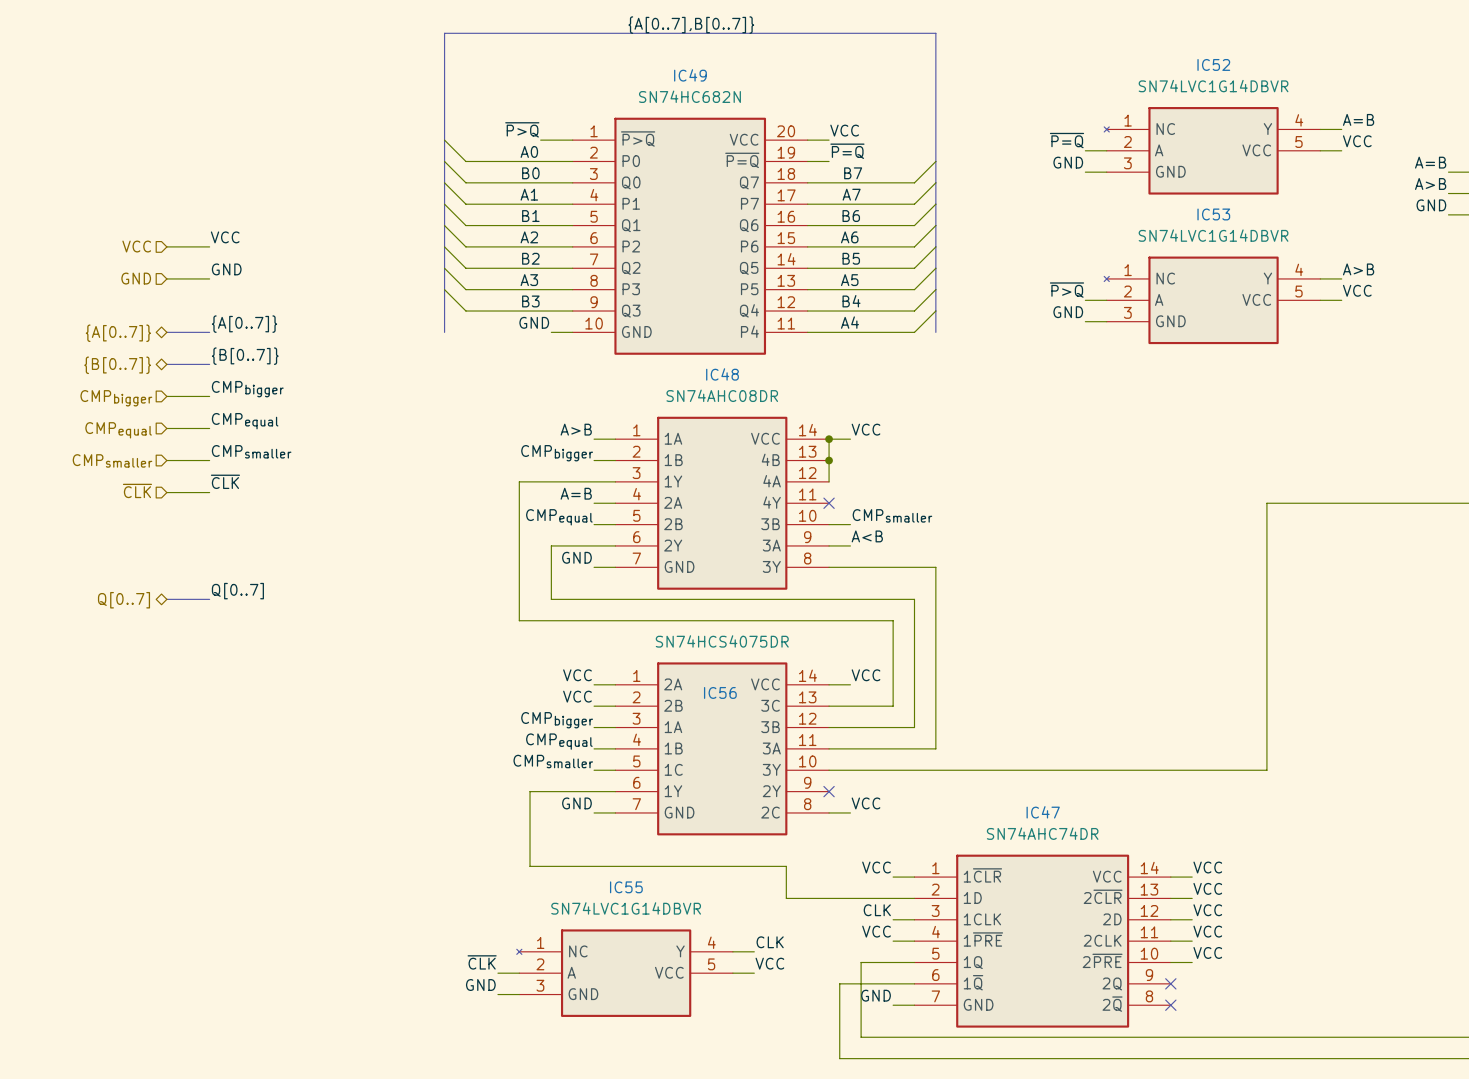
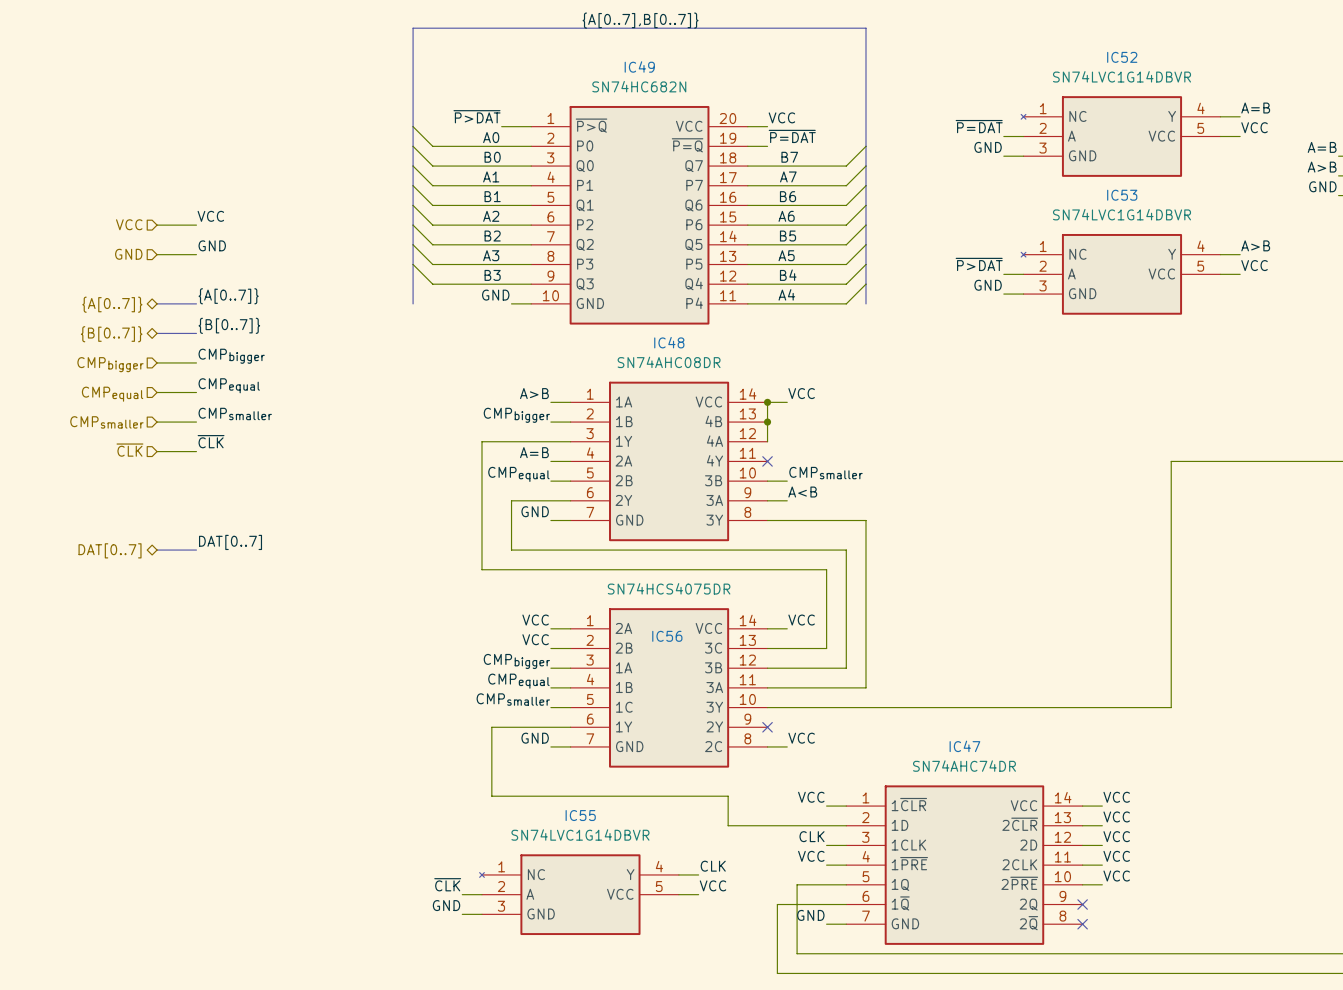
label: ~{P>Q} (522, 129) -> ~{P>DAT} (477, 116)
label: ~{P=Q} (1066, 140) -> ~{P=DAT} (979, 126)
label: ~{P=Q} (847, 151) -> ~{P=DAT} (792, 136)
label: ~{P>Q} (1066, 290) -> ~{P>DAT} (979, 264)
label: Q[0..7] (237, 591) -> DAT[0..7] (230, 542)
hierarchical label: Q[0..7] (123, 600) -> DAT[0..7] (110, 550)

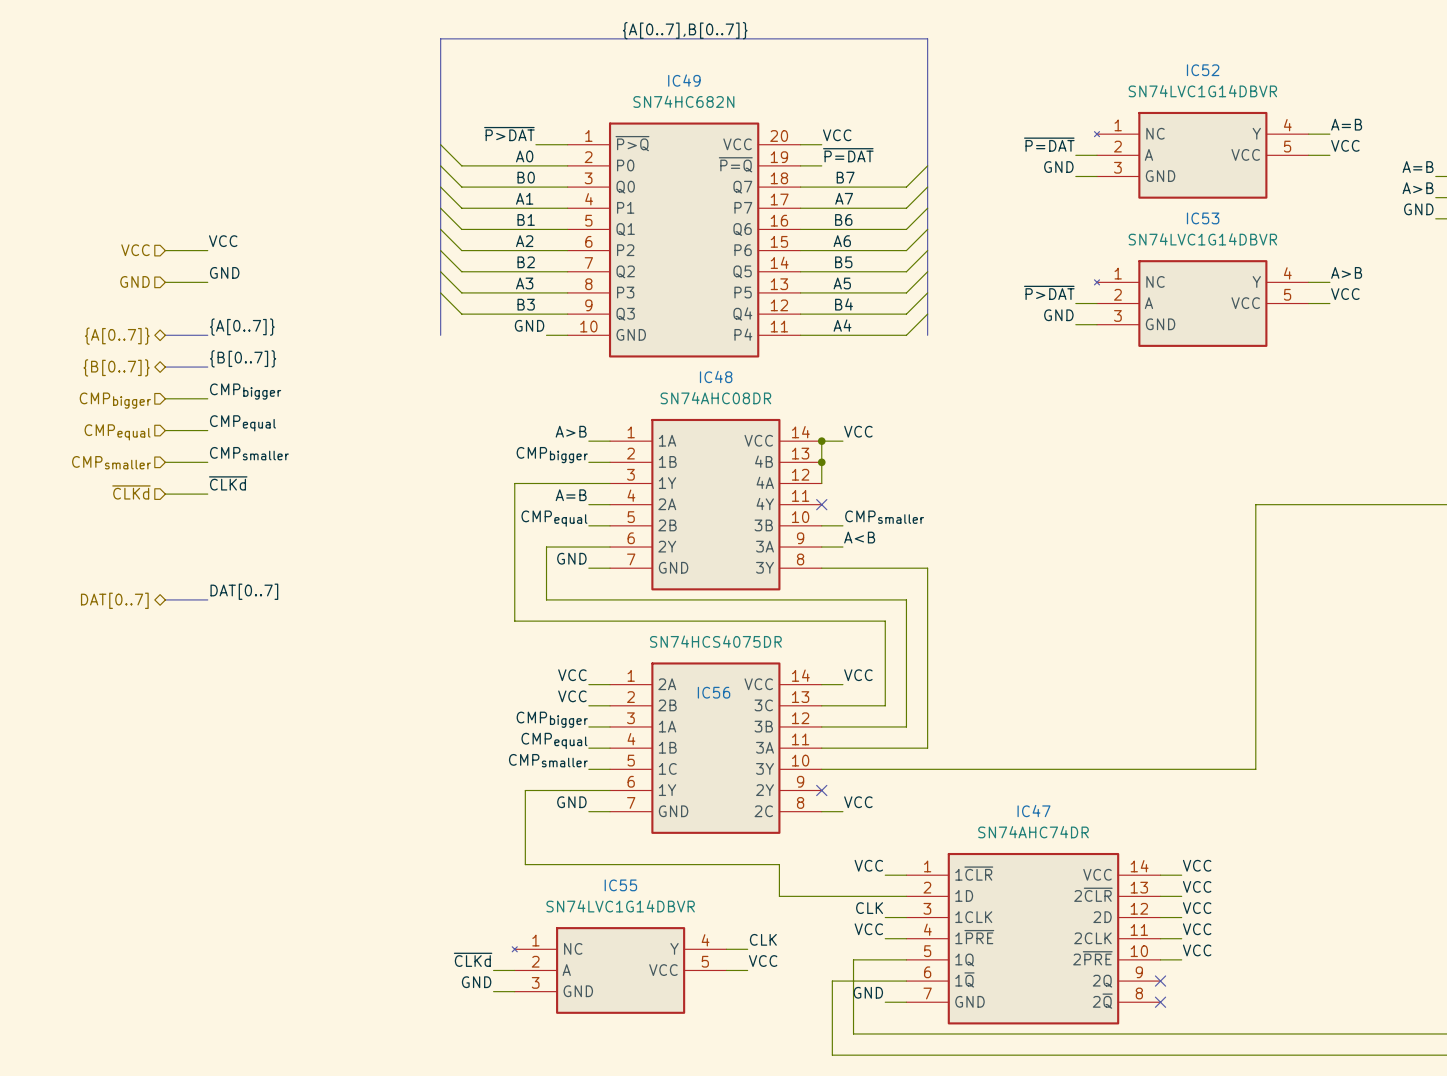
label: ~{CLK} (211, 441) -> ~{CLKd} (228, 483)
hierarchical label: ~{CLK} (129, 450) -> ~{CLKd} (131, 492)
label: ~{CLK} (447, 884) -> ~{CLKd} (473, 959)

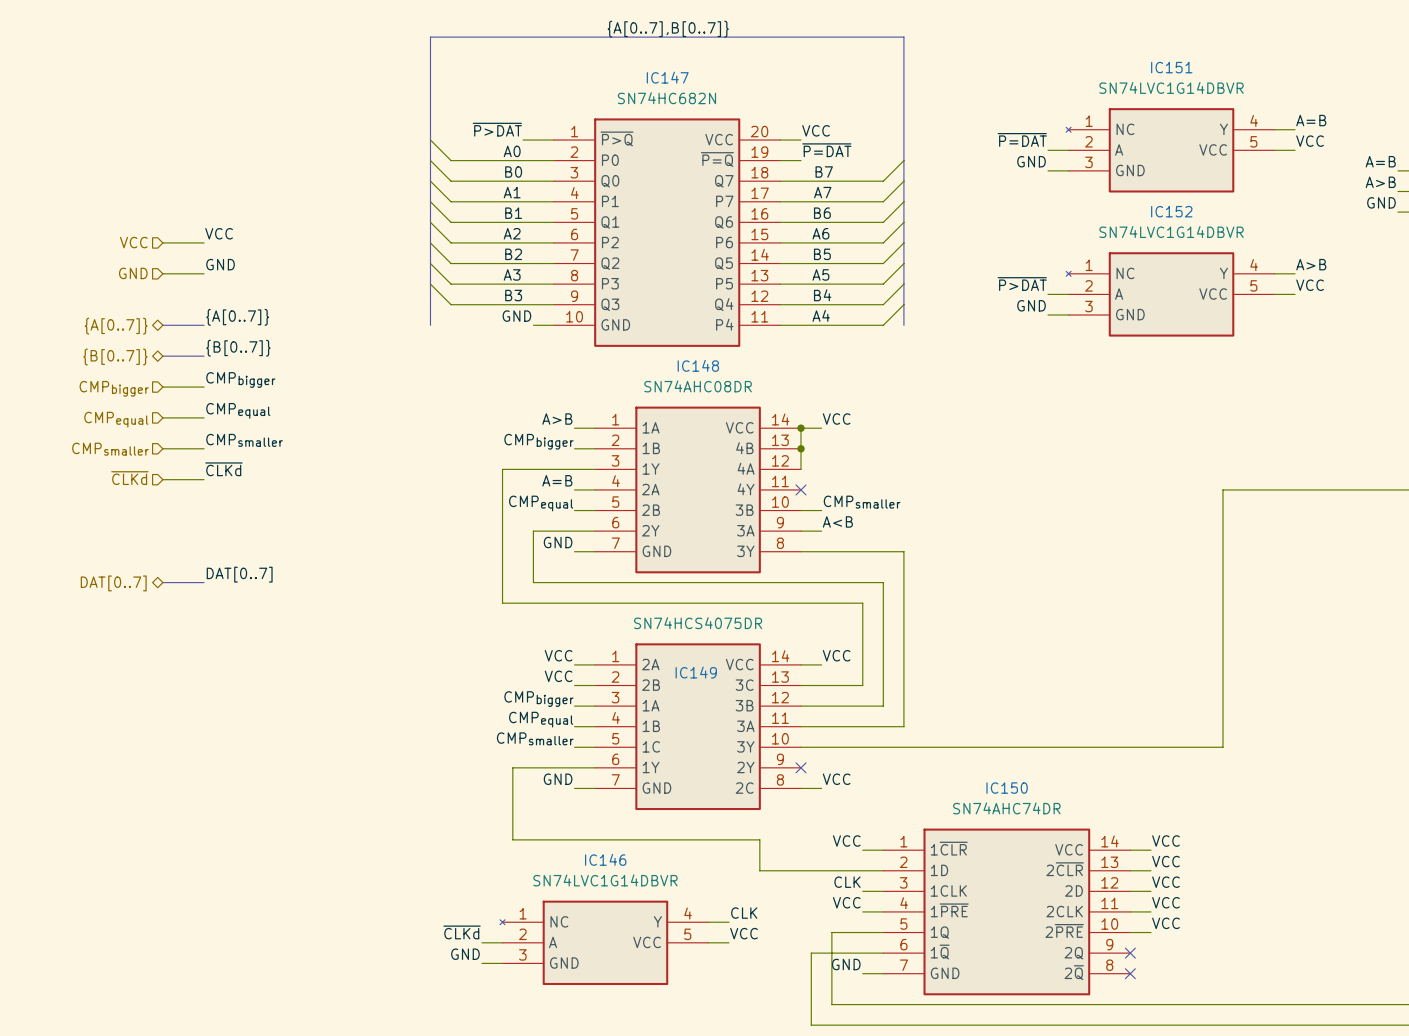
IC52 name: IC52 (1203, 70) -> IC151 (1171, 67)
IC49 name: IC49 (684, 80) -> IC147 (667, 77)
IC53 name: IC53 (1203, 218) -> IC152 (1171, 211)
IC48 name: IC48 (716, 376) -> IC148 (698, 365)
IC56 name: IC56 (714, 692) -> IC149 (696, 672)
IC47 name: IC47 (1033, 811) -> IC150 (1007, 788)
IC55 name: IC55 (620, 885) -> IC146 (605, 859)

